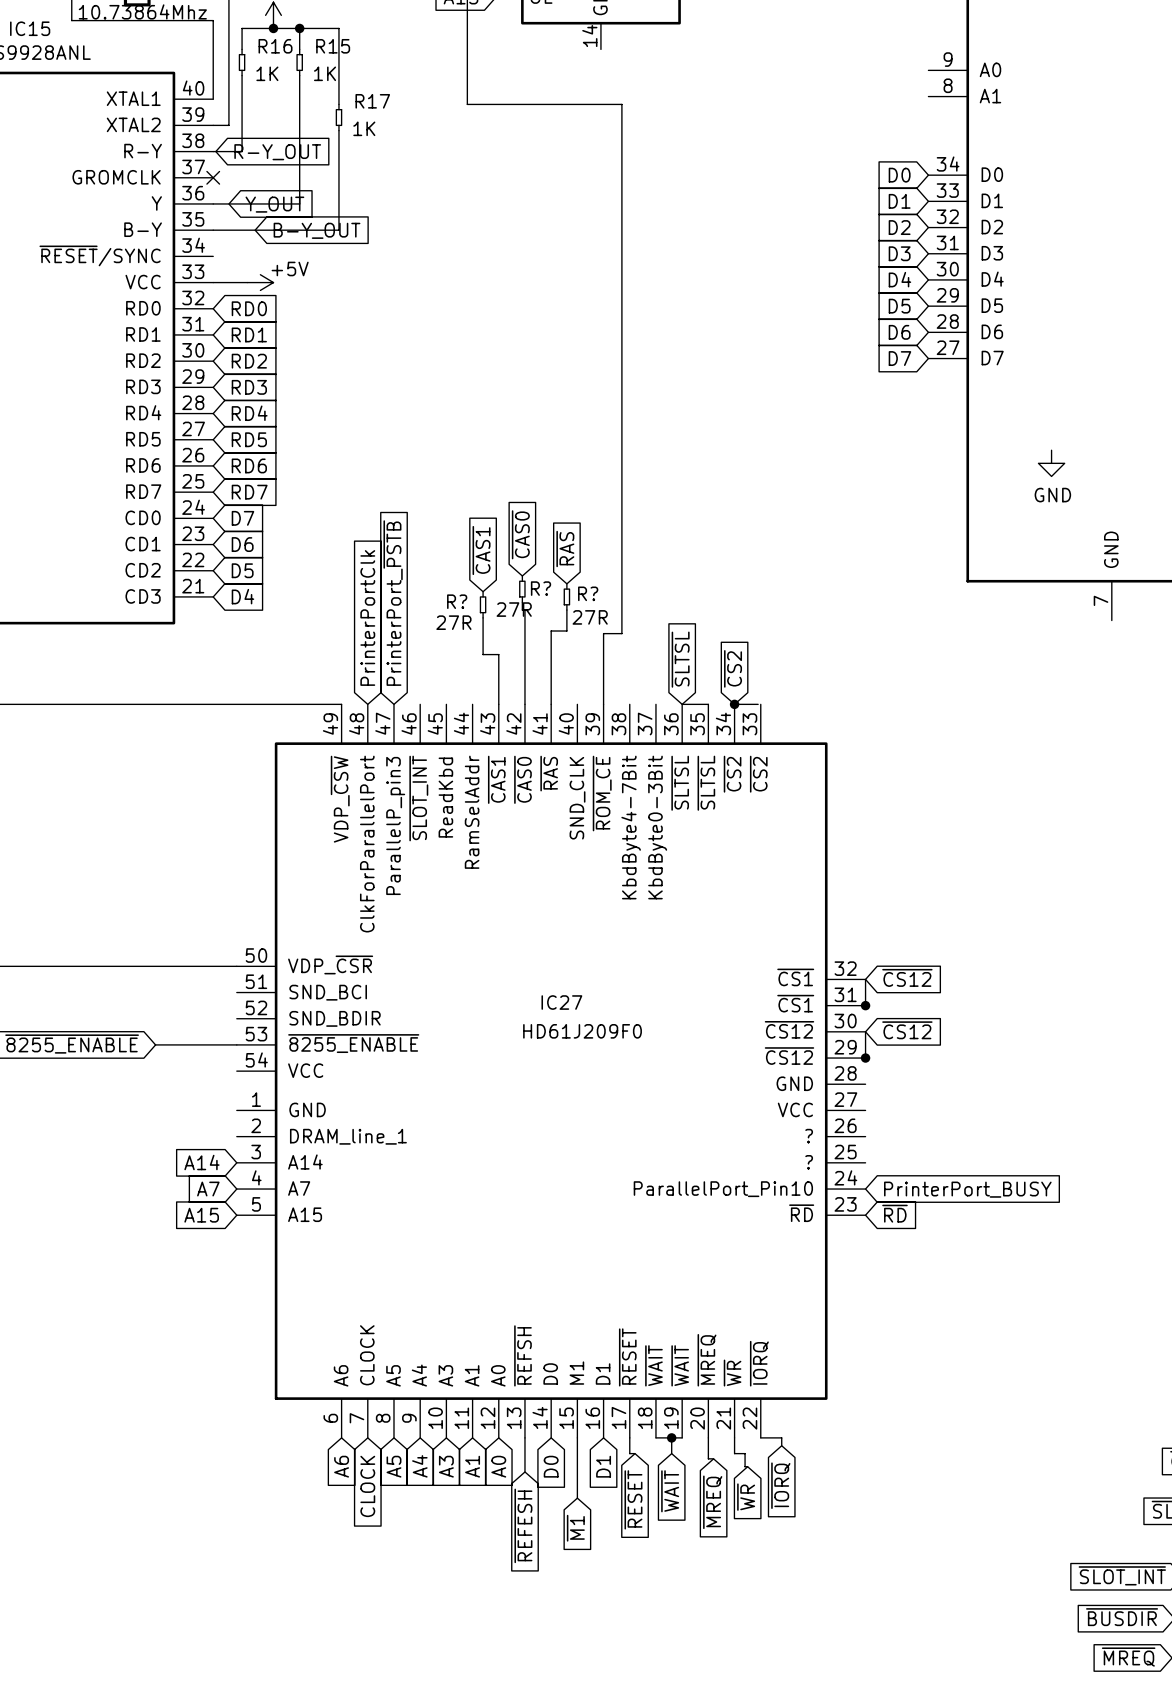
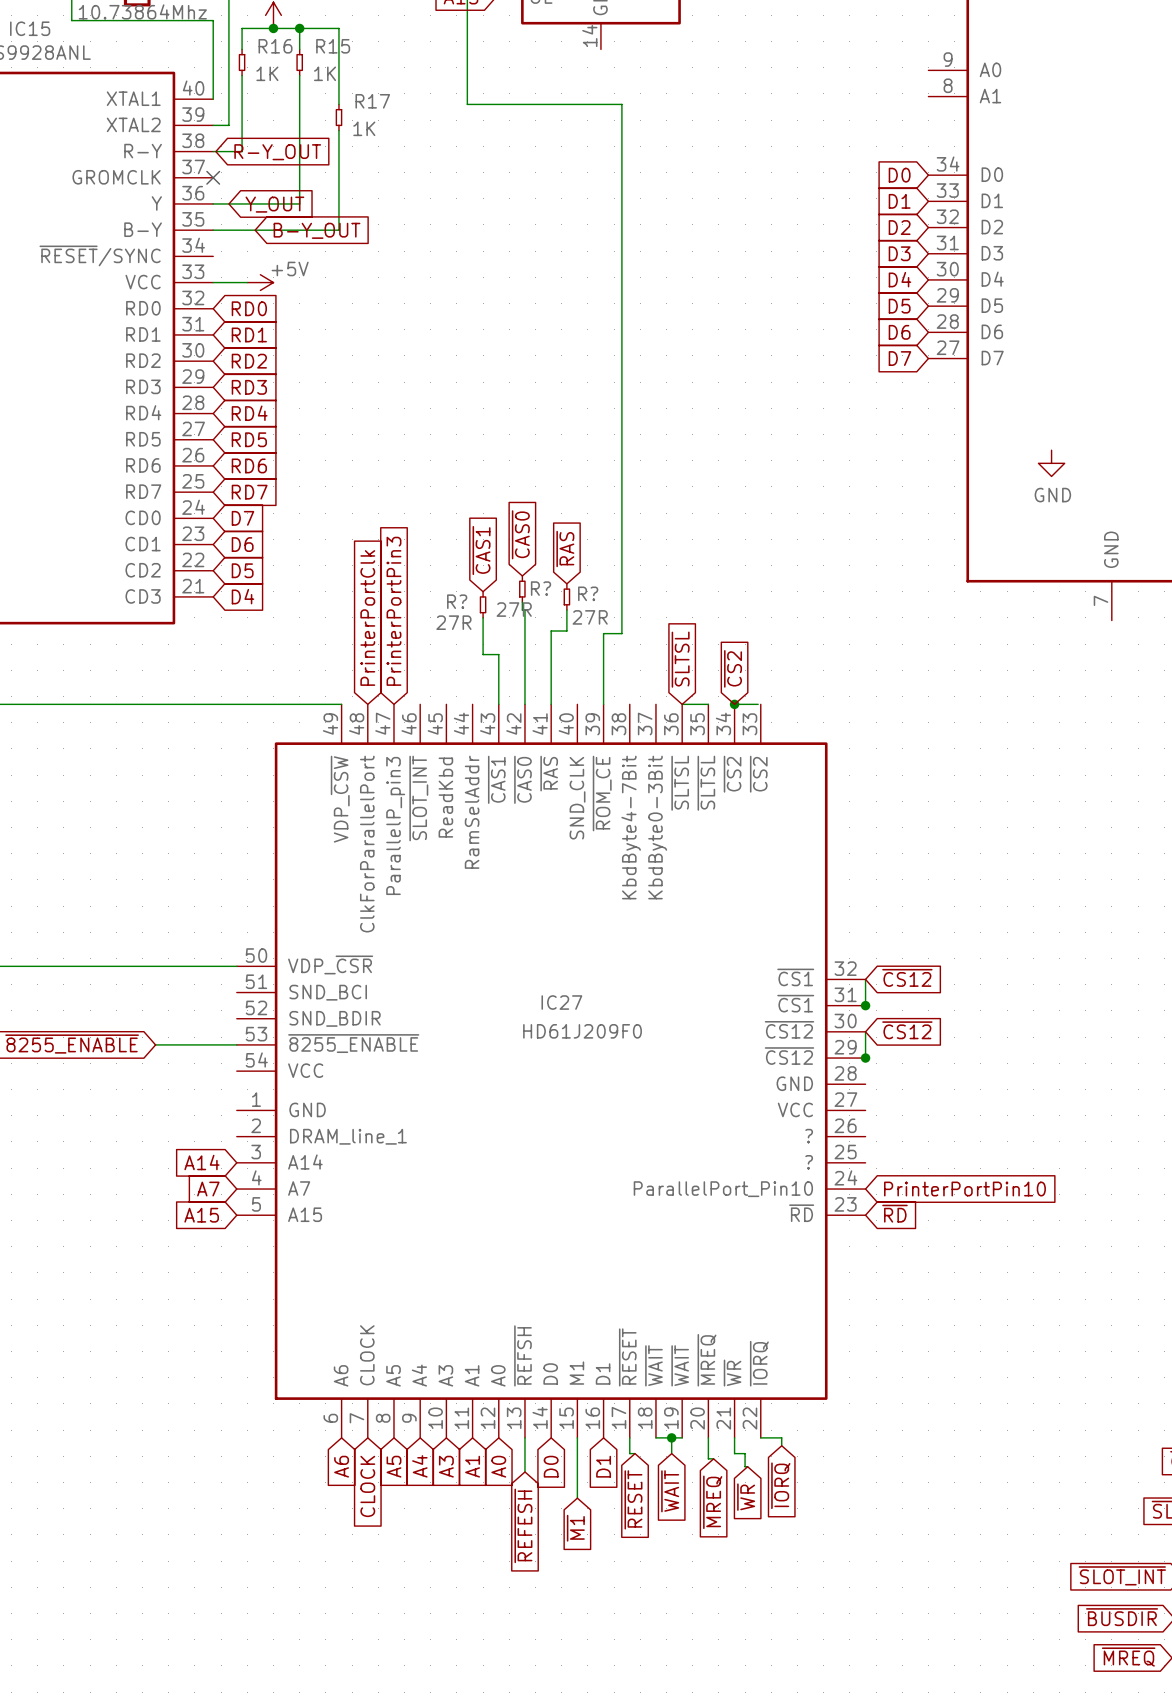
global label: PrinterPort_~{PSTB} (393, 603) -> PrinterPortPin3 (393, 611)
global label: PrinterPort_BUSY (967, 1189) -> PrinterPortPin10 (964, 1189)

